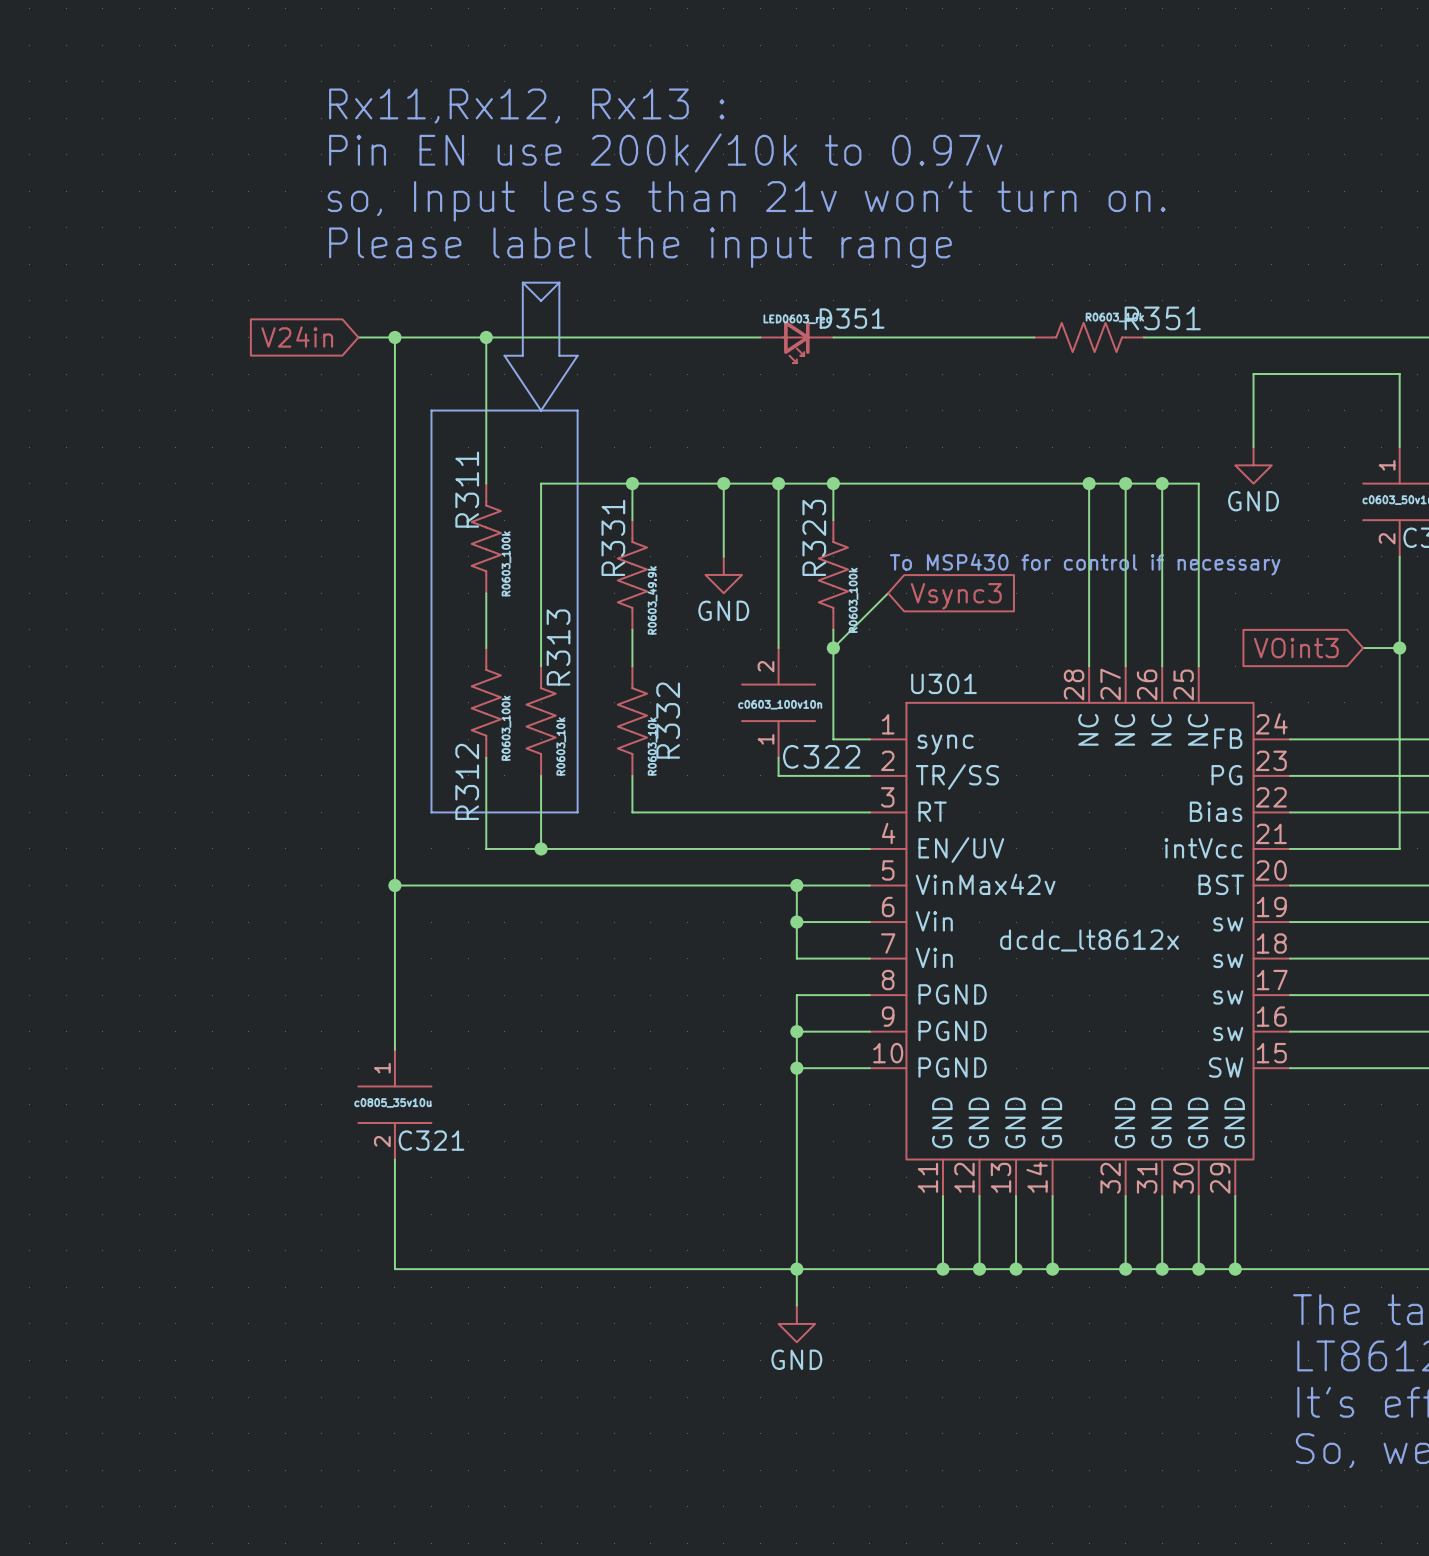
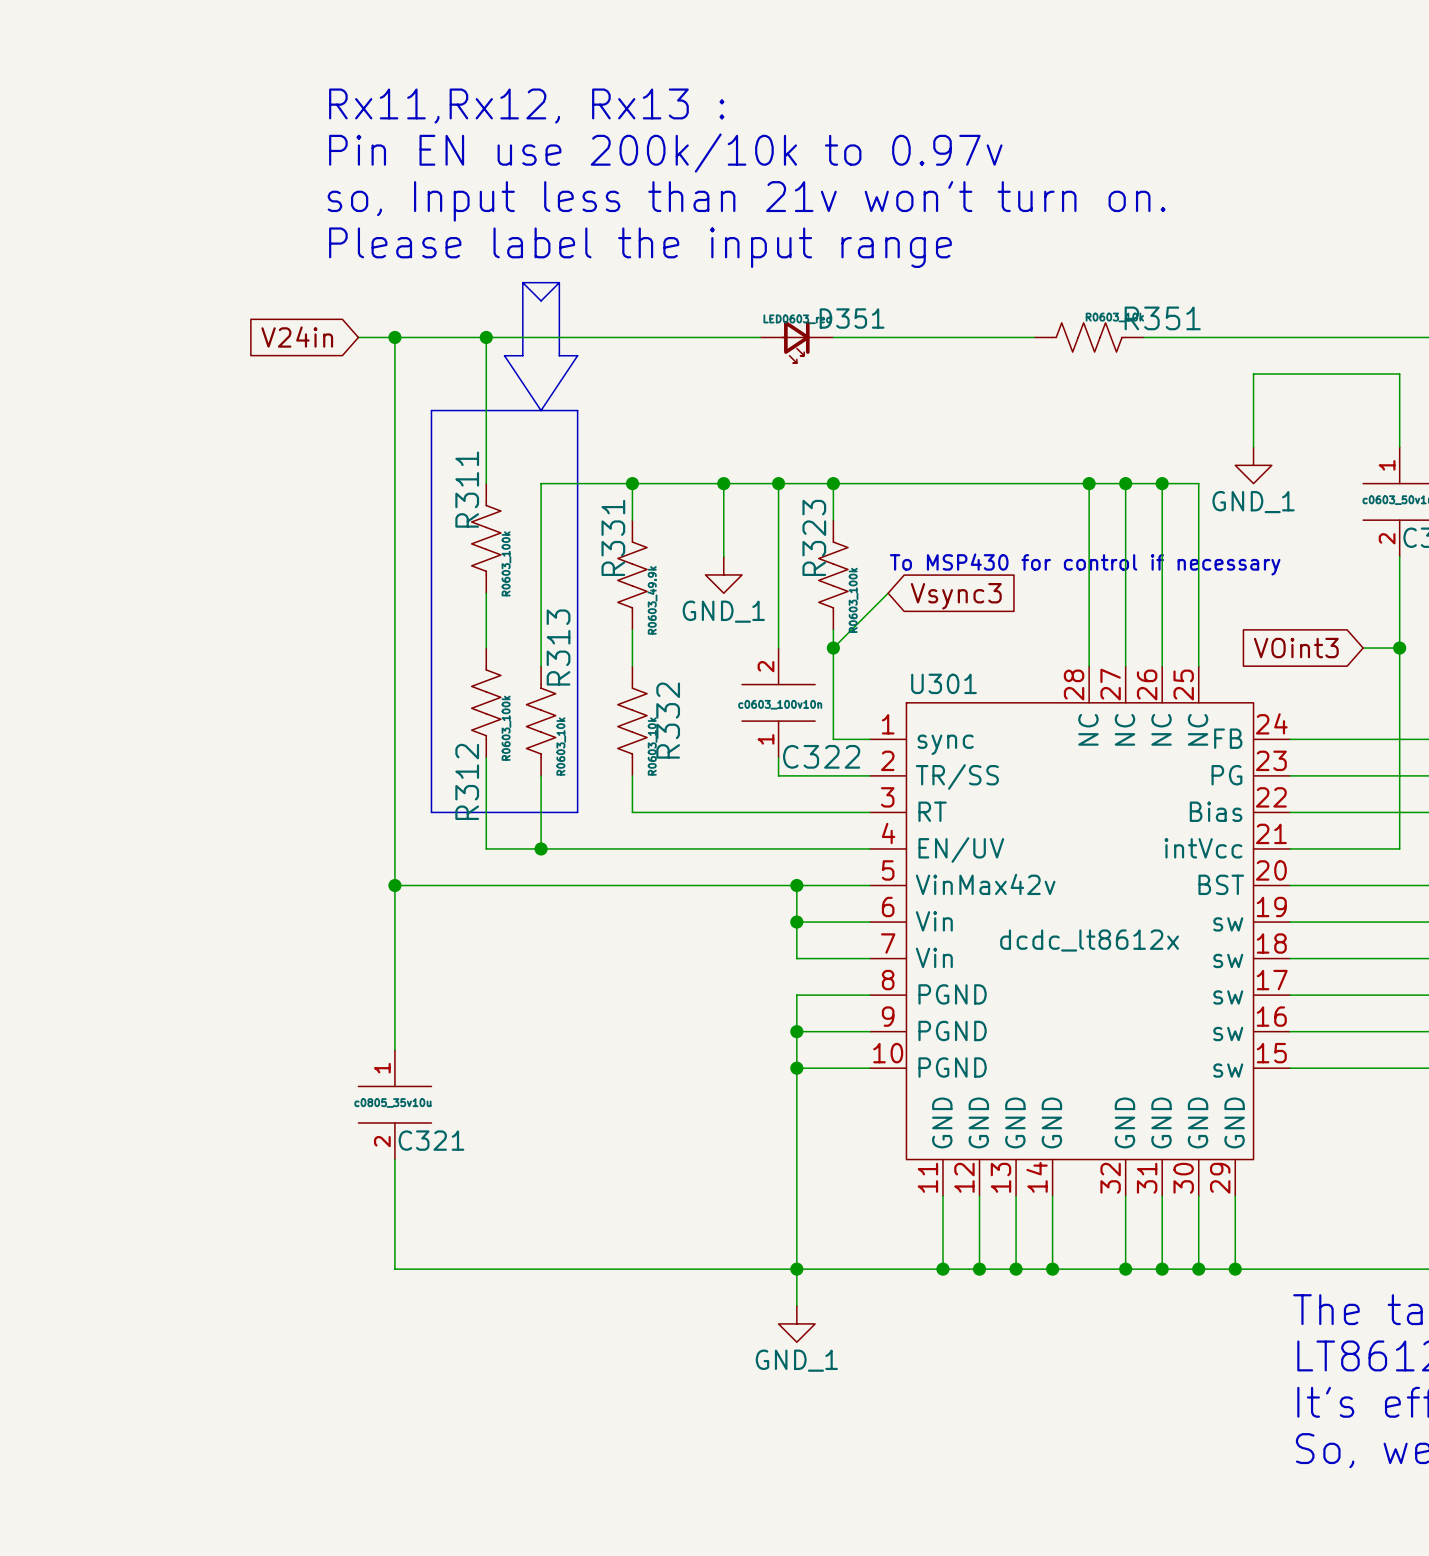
power symbol: GND (1253, 465) -> GND_1 (1253, 465)
power symbol: GND (723, 574) -> GND_1 (723, 574)
U301 pin name: SW (1226, 1067) -> sw (1228, 1070)
power symbol: GND (796, 1323) -> GND_1 (796, 1323)

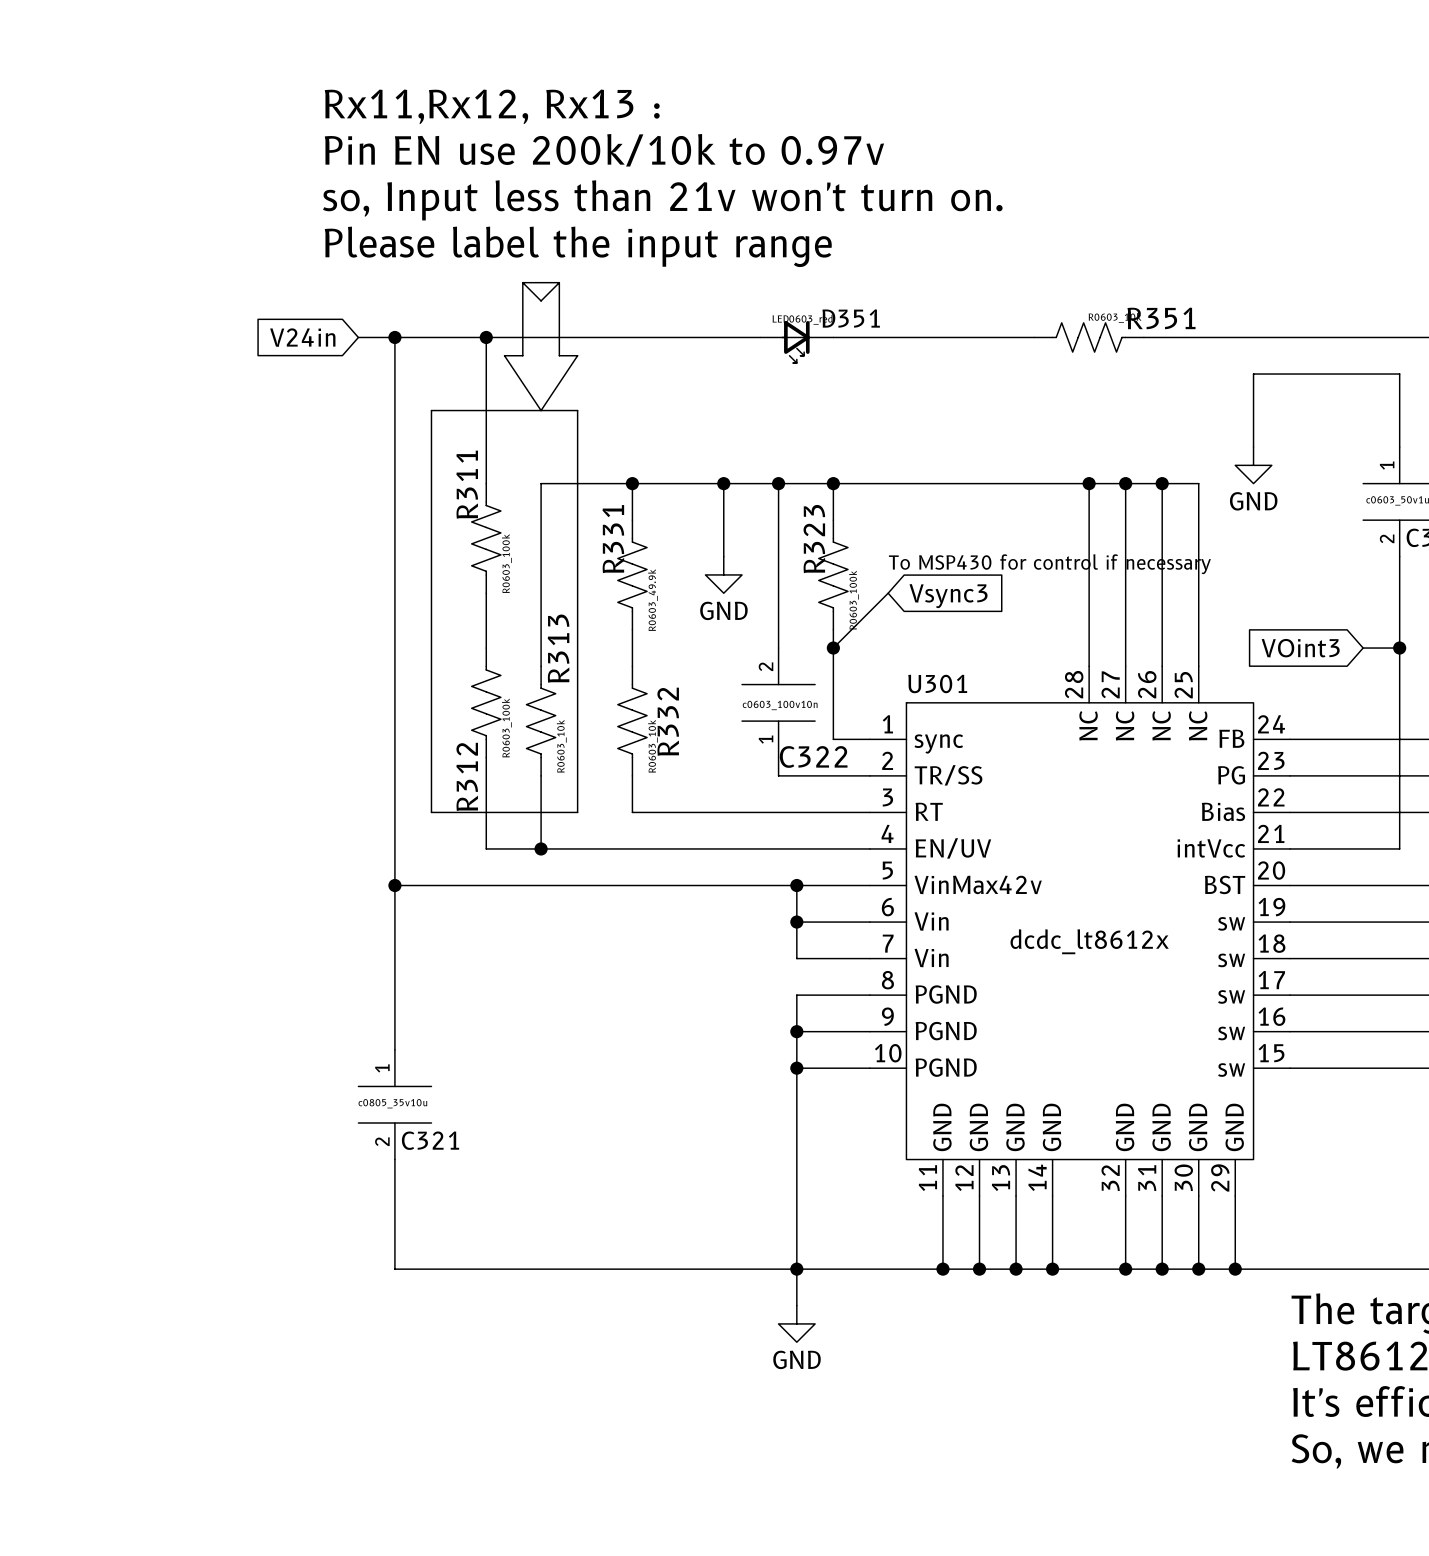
power symbol: GND_1 (1253, 465) -> GND (1253, 465)
power symbol: GND_1 (723, 574) -> GND (723, 574)
power symbol: GND_1 (796, 1323) -> GND (796, 1323)

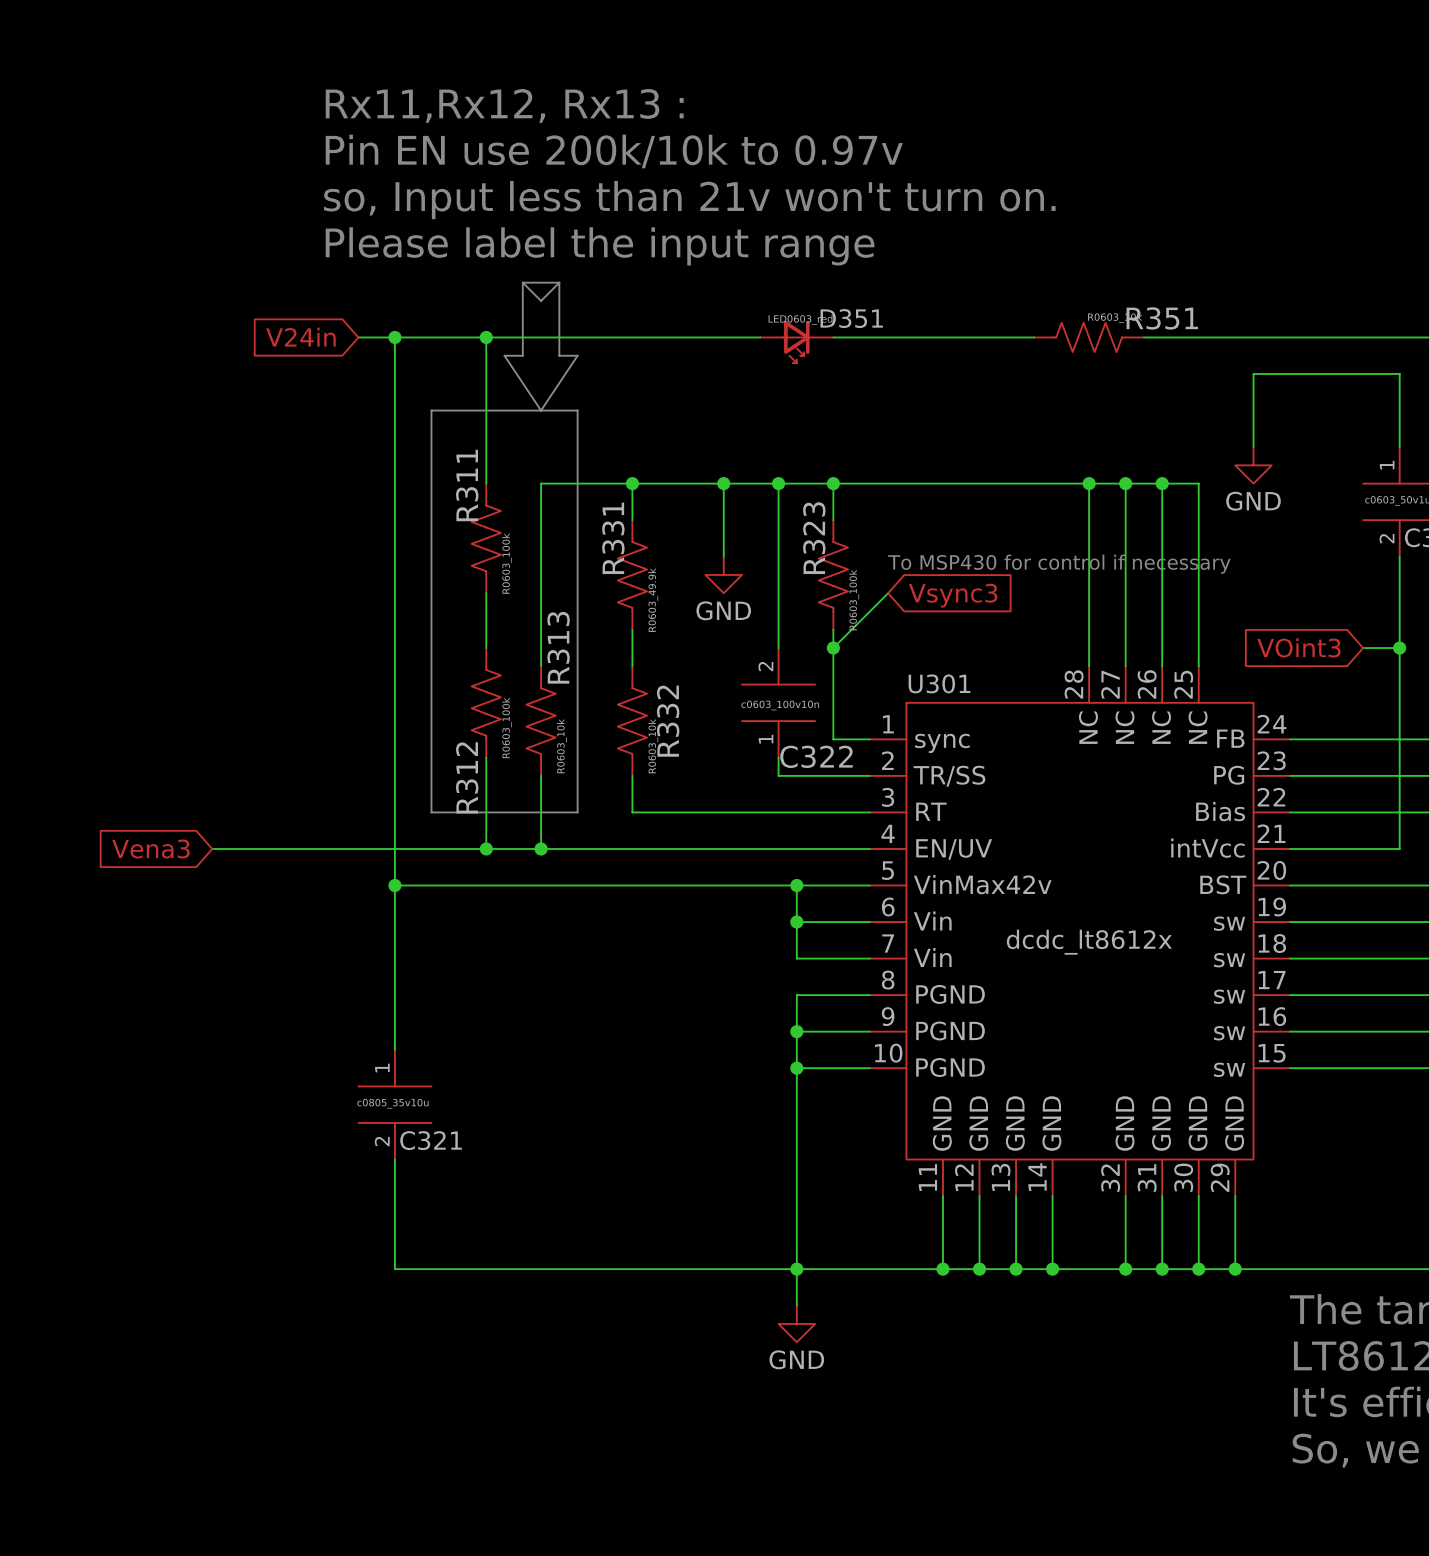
wire: none -> (212, 848) (486, 848)
junction: none -> (486, 848)
global label: none -> Vena3 (150, 848)

